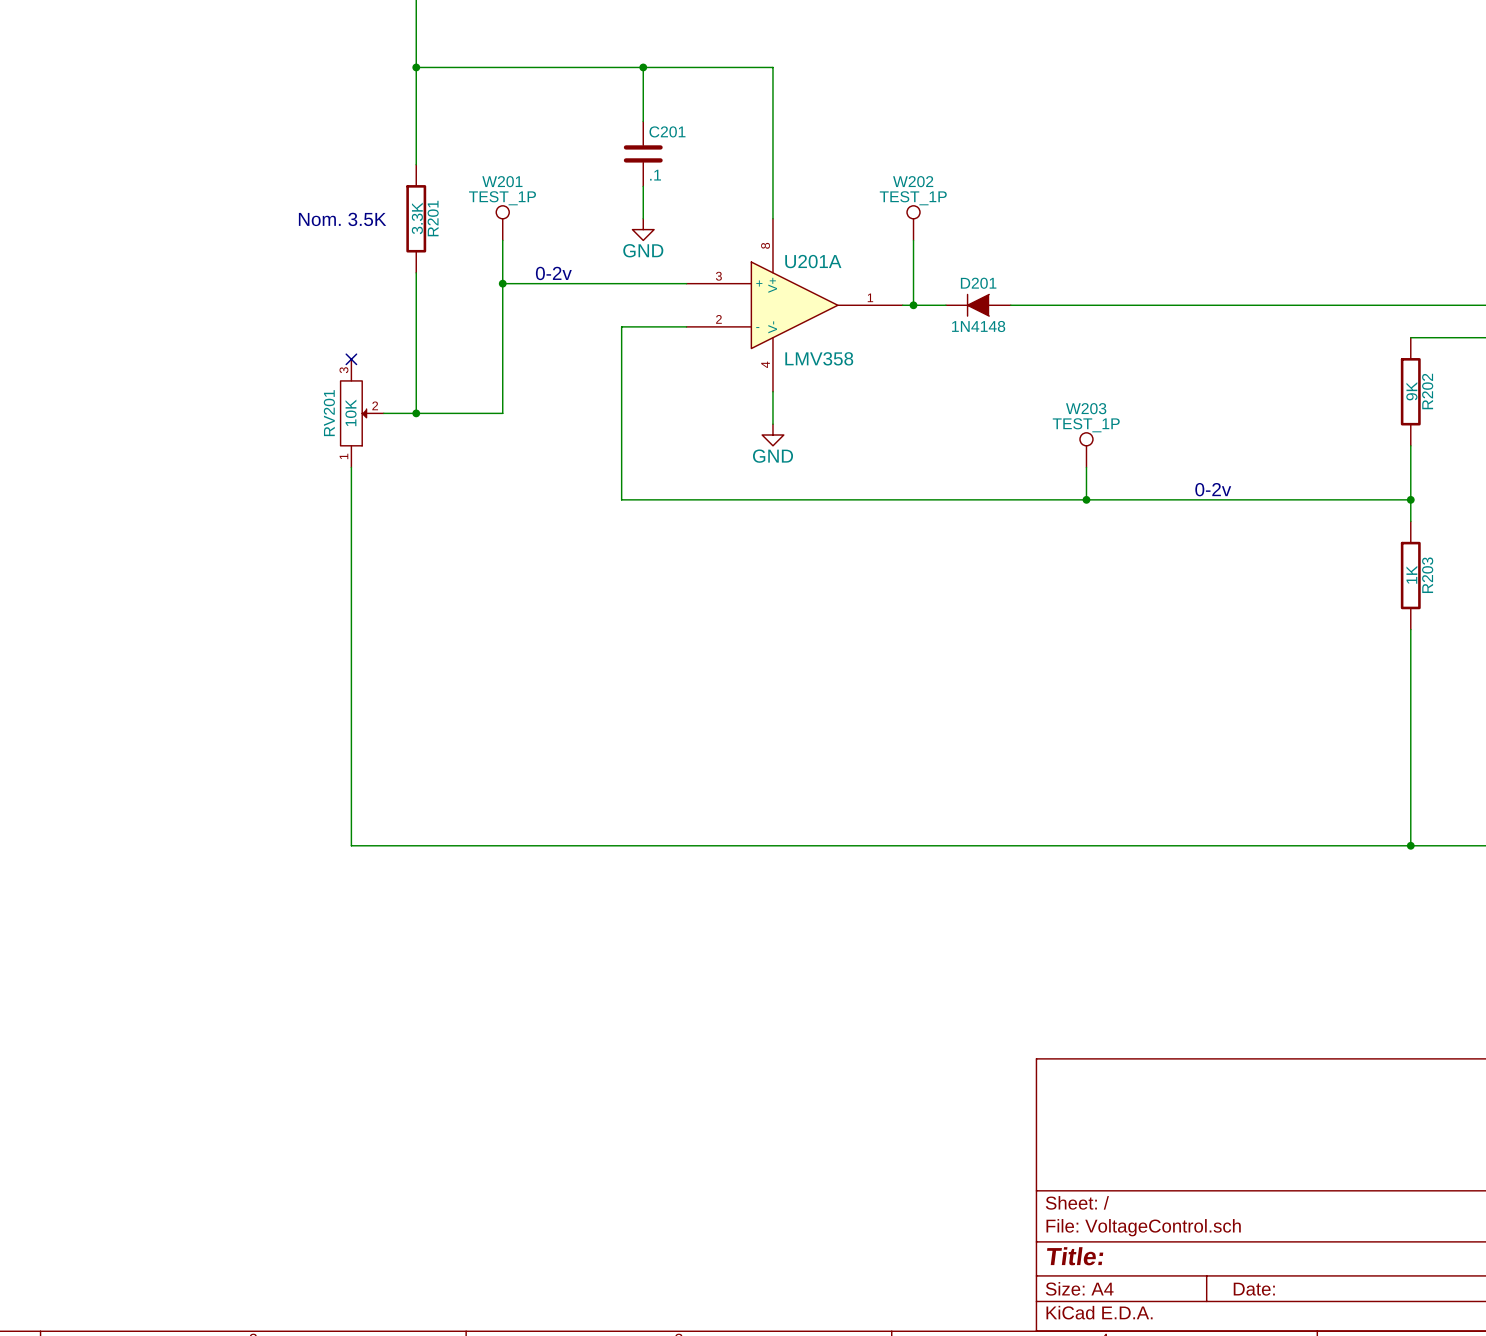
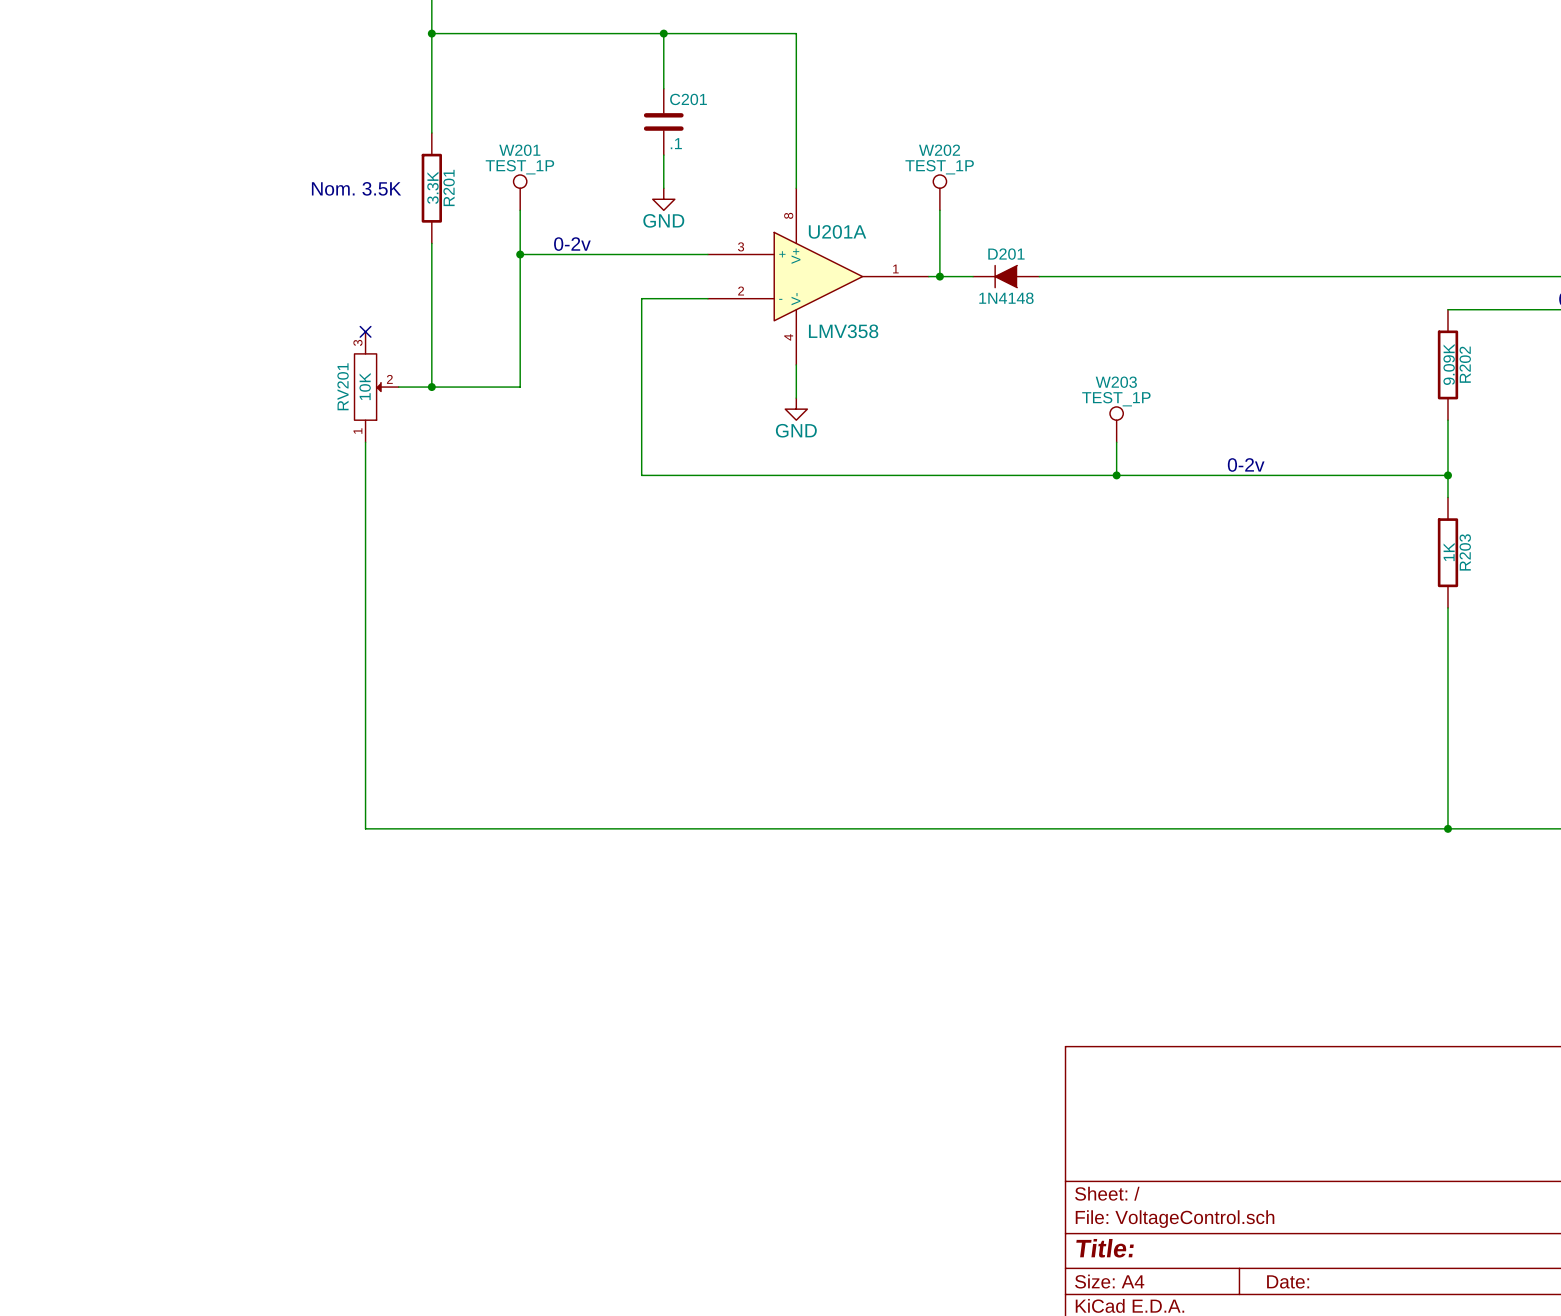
R202 value: 9K (1411, 391) -> 9.09K (1449, 364)

